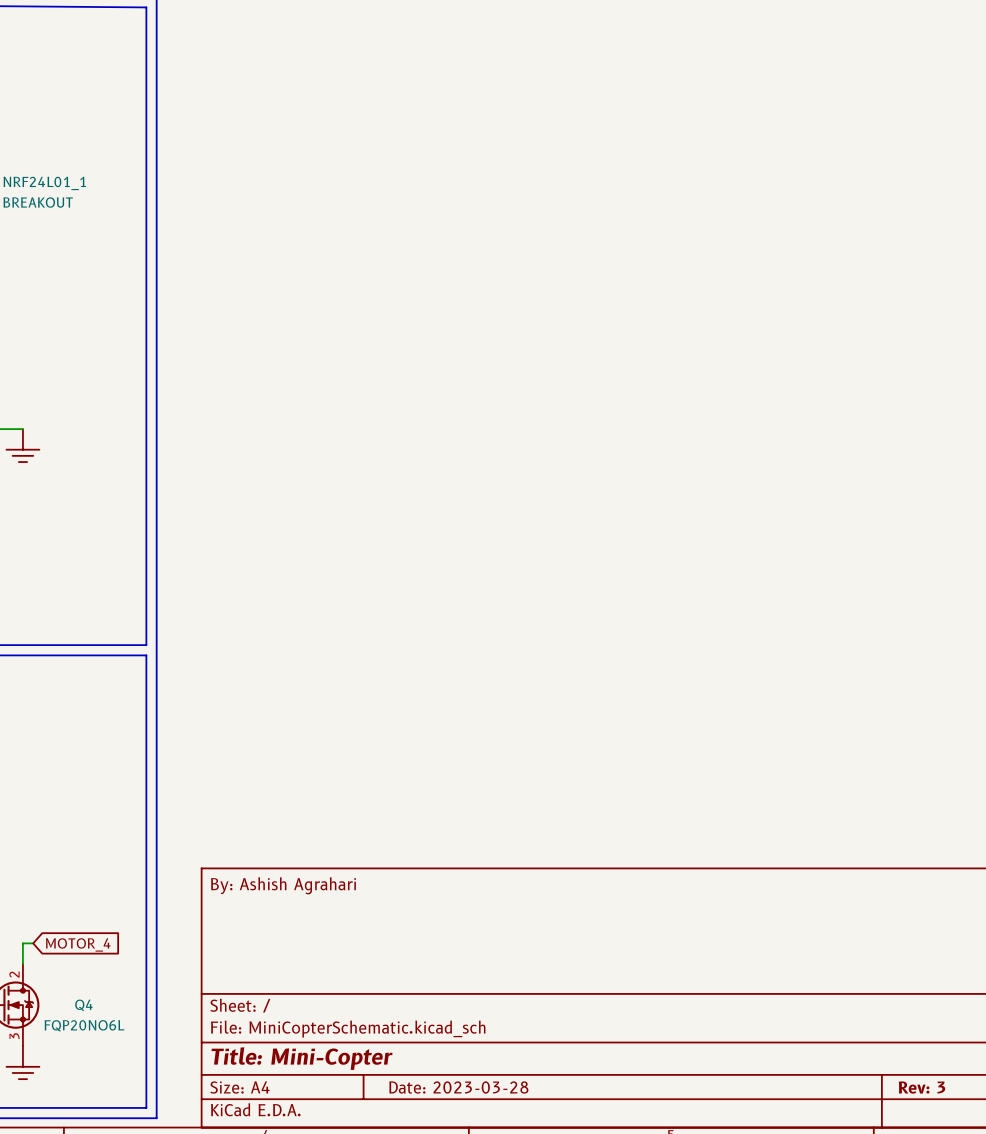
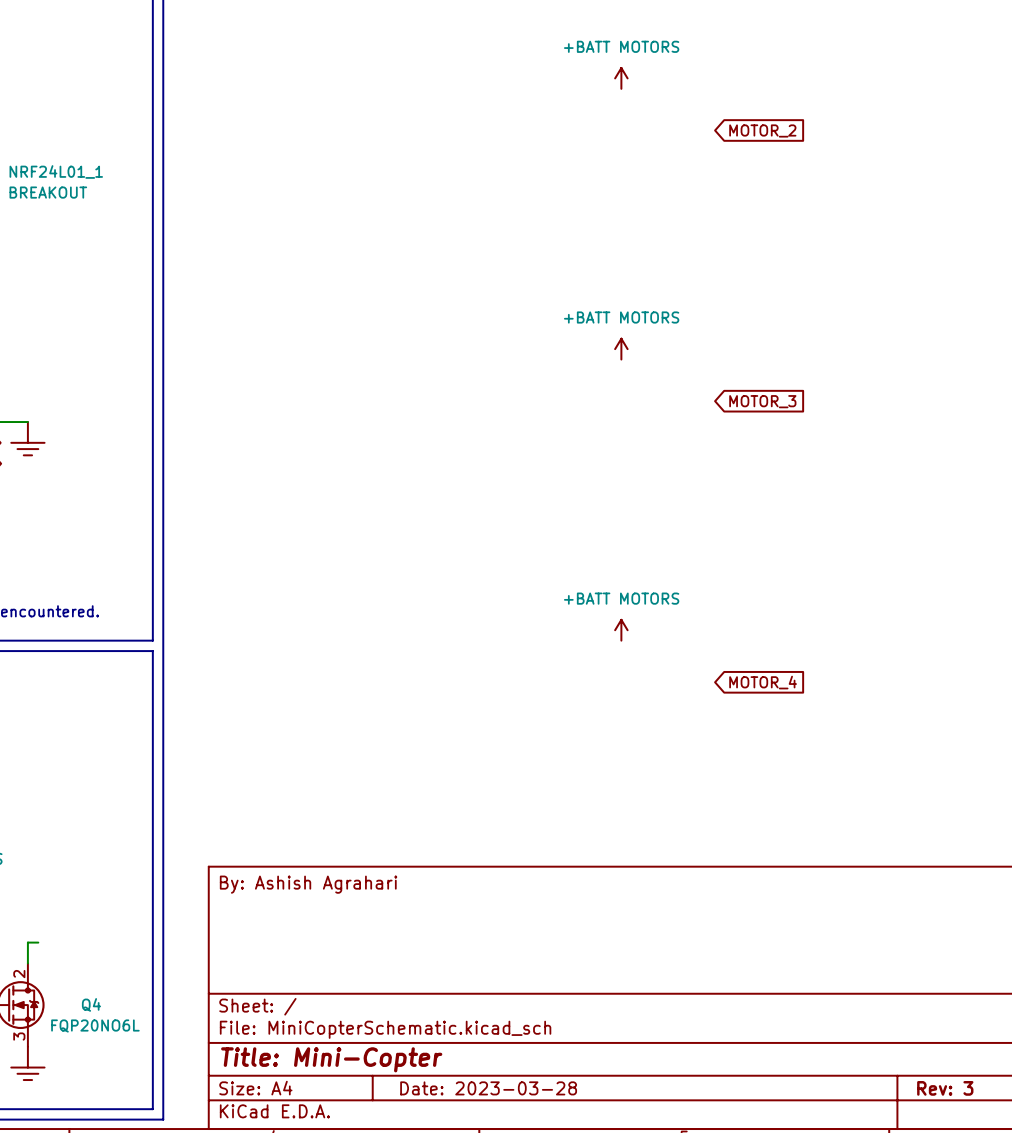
power symbol: none -> +BATT MOTORS (621, 78)
global label: none -> MOTOR_2 (762, 130)
power symbol: none -> +BATT MOTORS (621, 349)
global label: none -> MOTOR_3 (762, 401)
power symbol: none -> +BATT MOTORS (621, 630)
global label: none -> MOTOR_4 (763, 682)
global label: MOTOR_4 (78, 944) -> none

